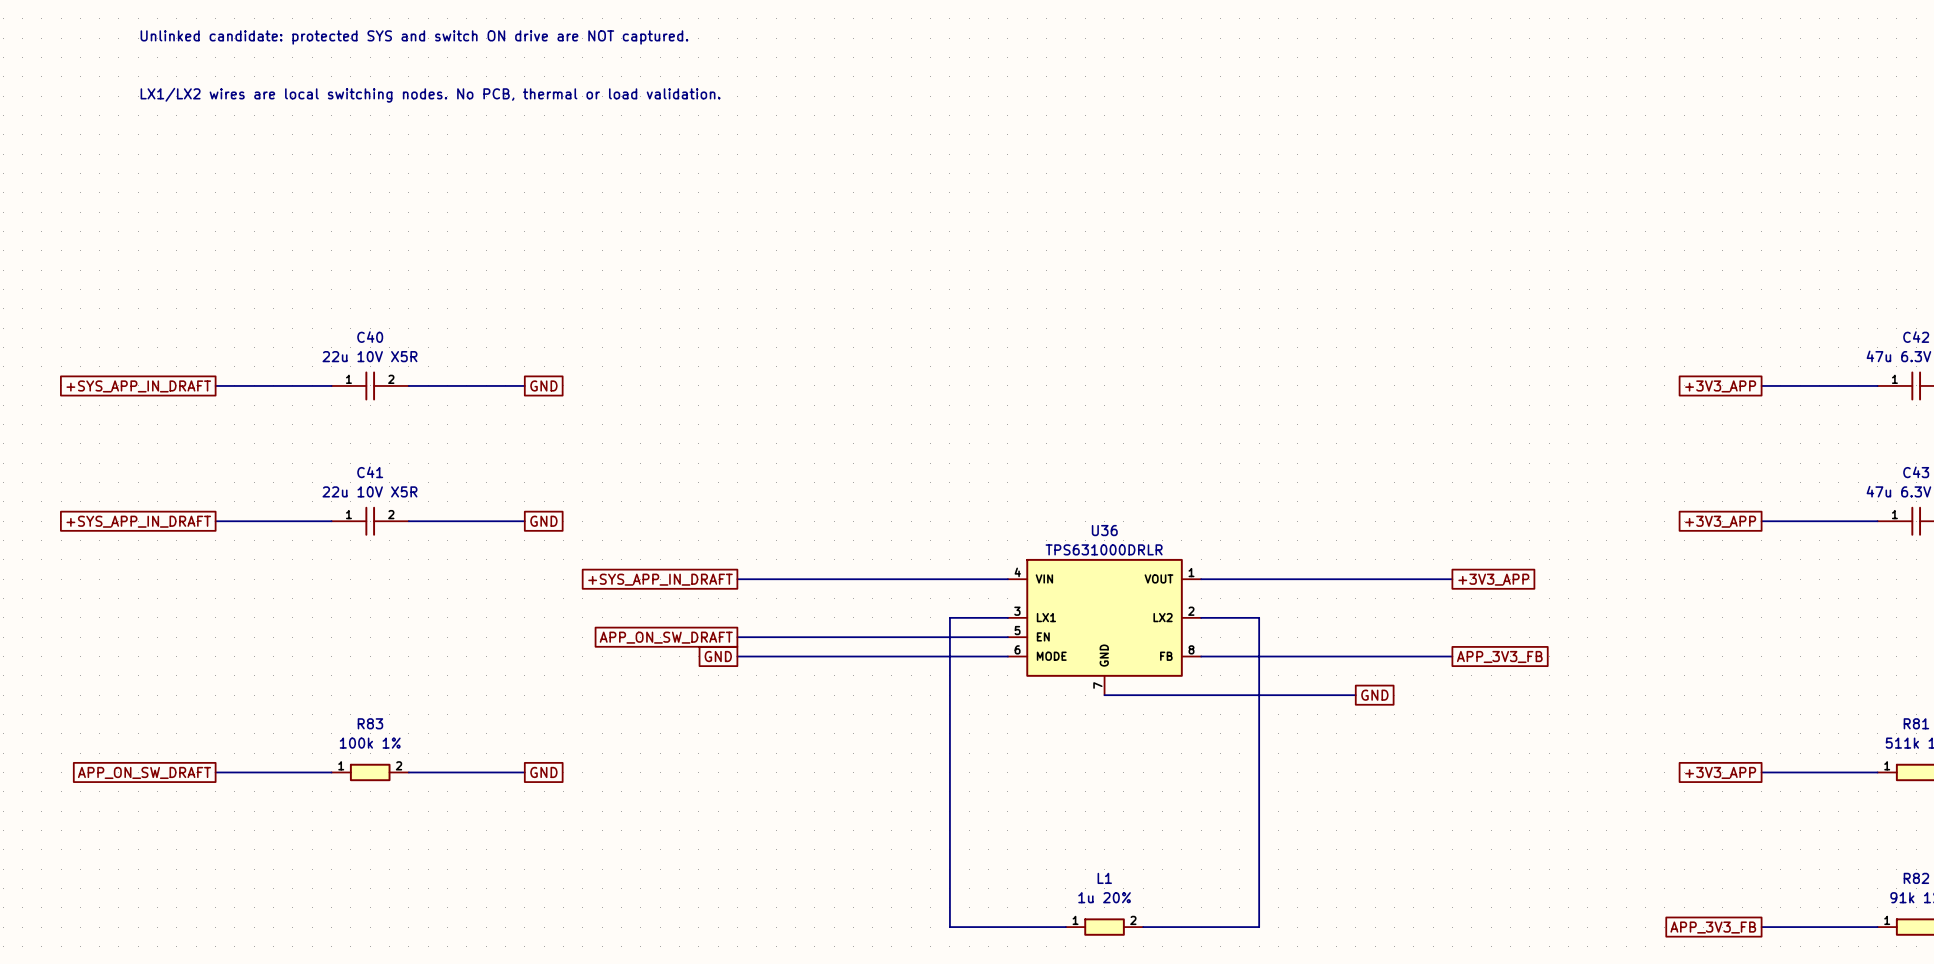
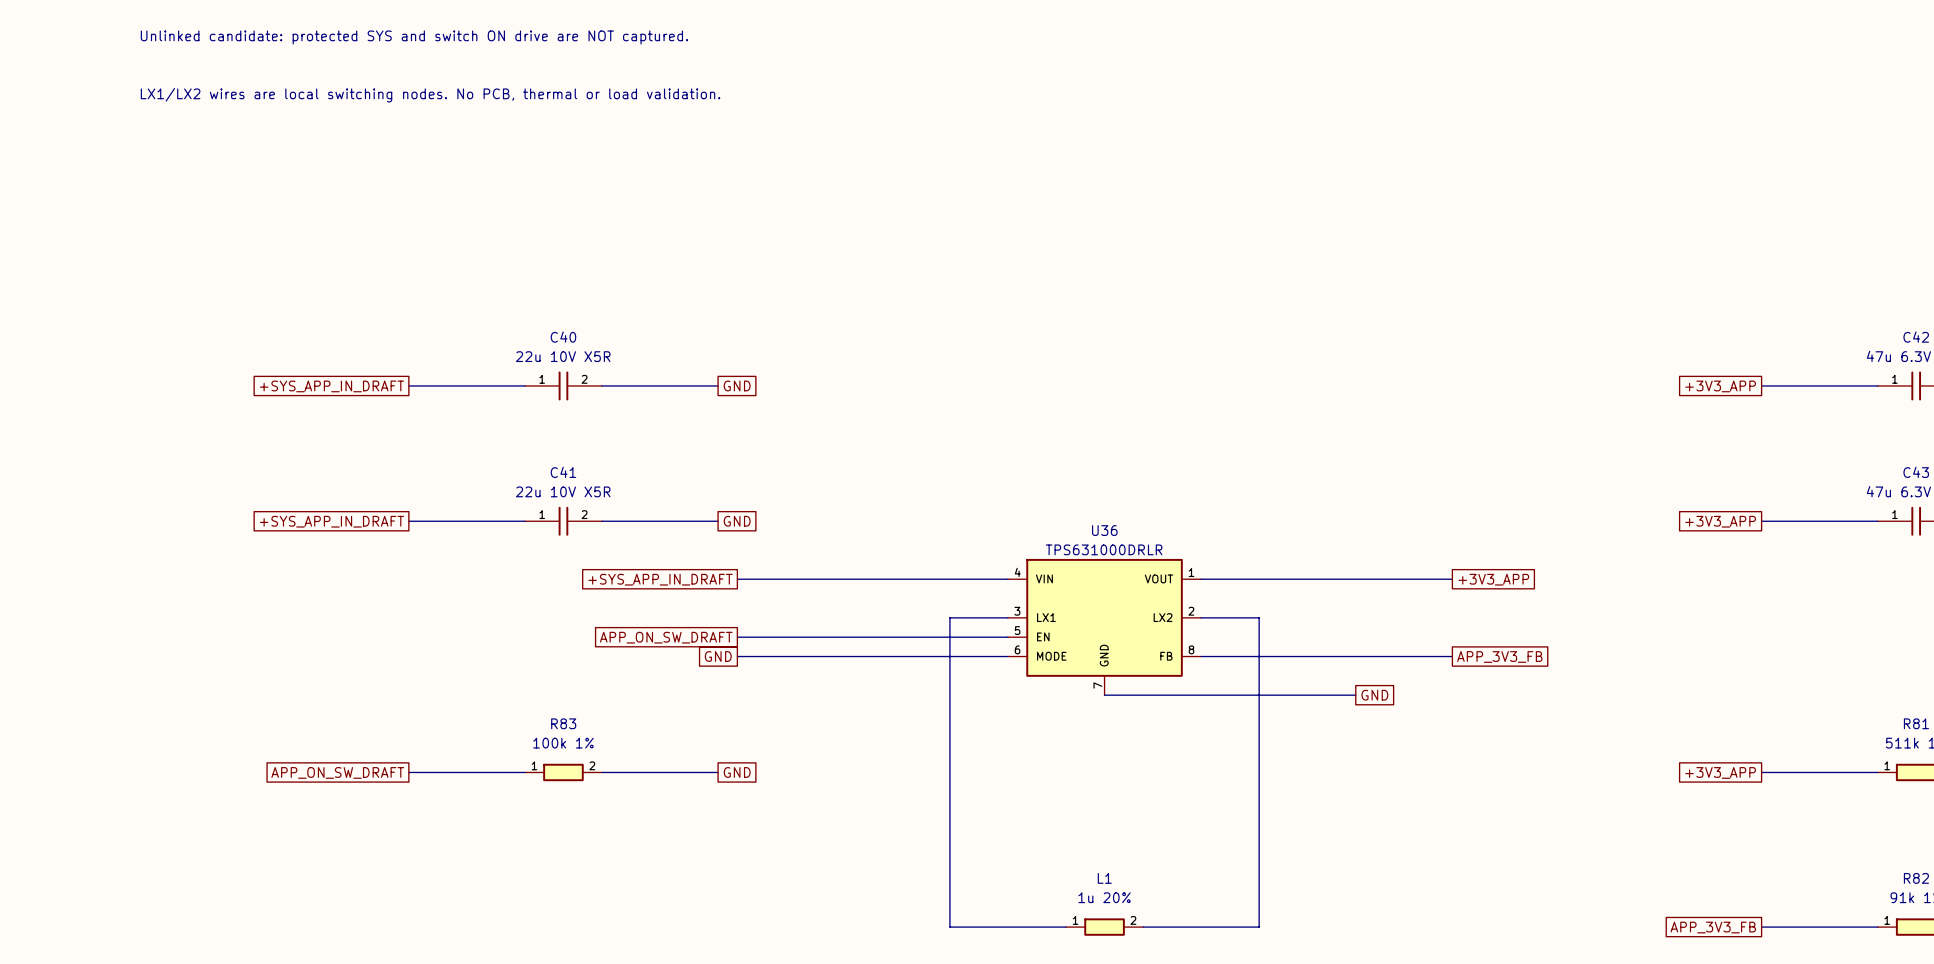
wire: (215, 385) (331, 385) -> none
C40 position: (370, 385) -> (563, 385)
global label: GND (543, 385) -> none
wire: none -> (602, 385) (718, 385)
global label: none -> GND (737, 385)
global label: +SYS_APP_IN_DRAFT (138, 386) -> none
global label: none -> +SYS_APP_IN_DRAFT (332, 386)
global label: +SYS_APP_IN_DRAFT (138, 521) -> none
wire: (215, 521) (331, 521) -> none
global label: none -> +SYS_APP_IN_DRAFT (332, 521)
C41 position: (370, 521) -> (563, 521)
global label: GND (543, 521) -> none
wire: none -> (602, 521) (718, 521)
global label: none -> GND (737, 521)
global label: APP_ON_SW_DRAFT (144, 772) -> none
wire: (215, 772) (331, 772) -> none
global label: none -> APP_ON_SW_DRAFT (337, 772)
R83 position: (370, 772) -> (563, 772)
global label: GND (543, 772) -> none
wire: none -> (602, 772) (718, 772)
global label: none -> GND (737, 772)

